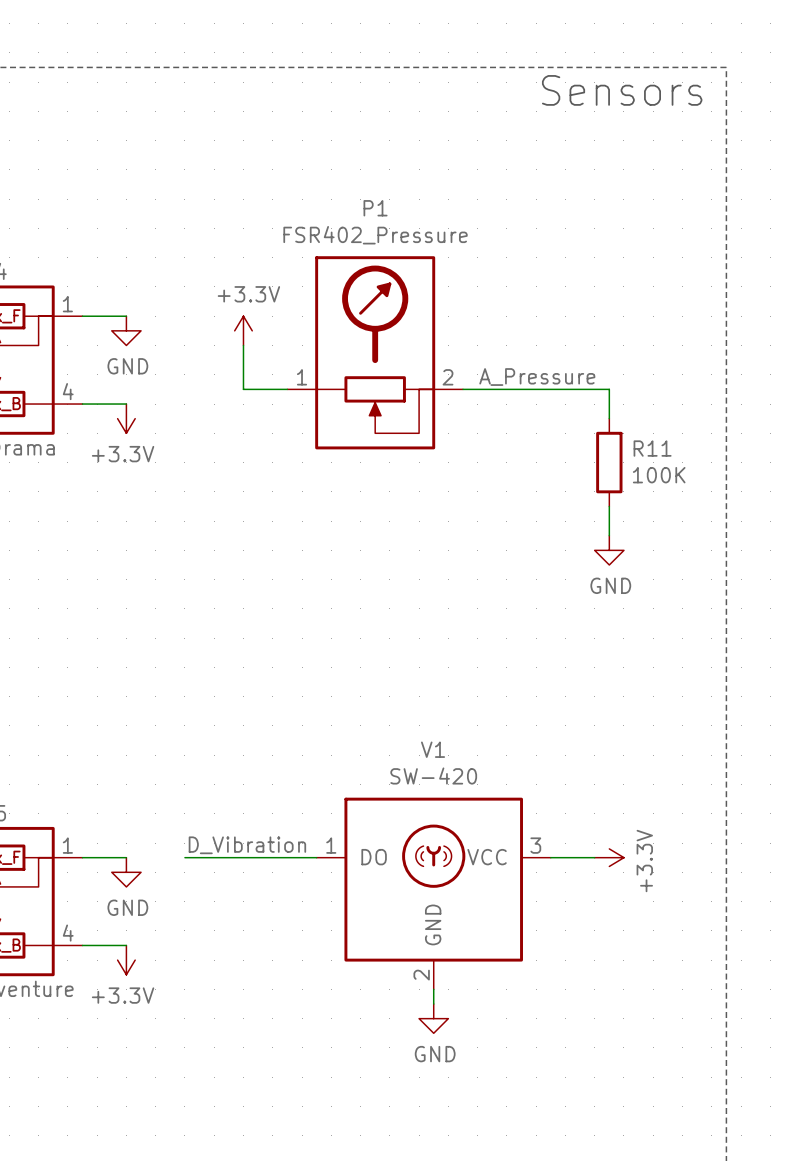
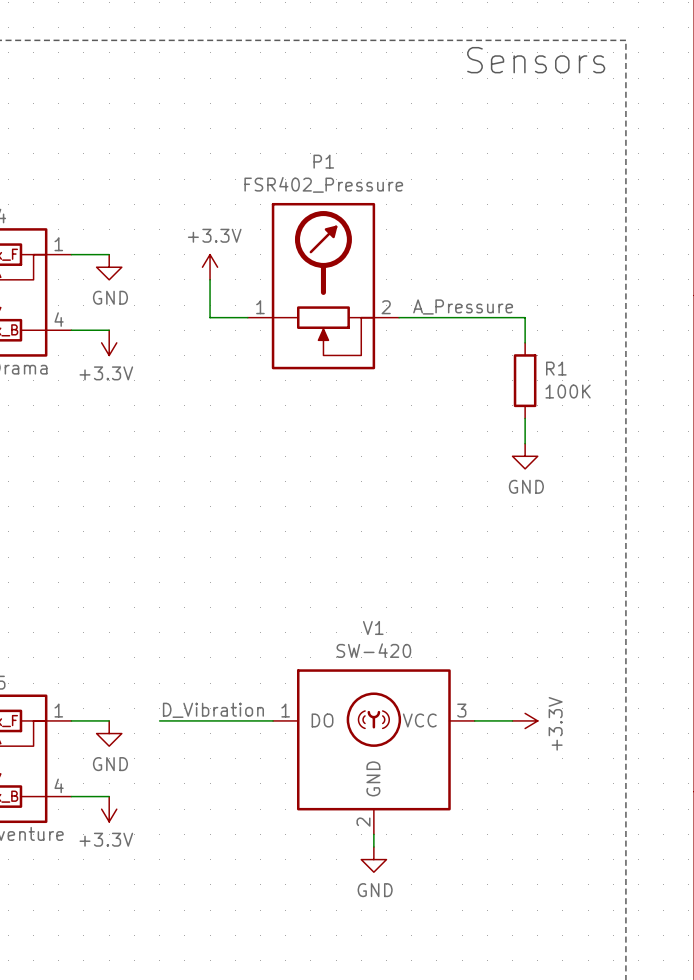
R11 name: R11 (652, 448) -> R1 (556, 368)

